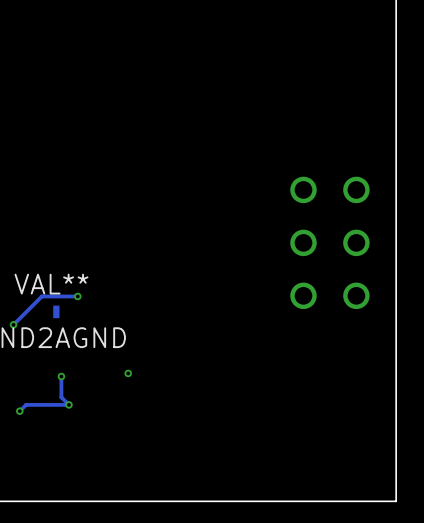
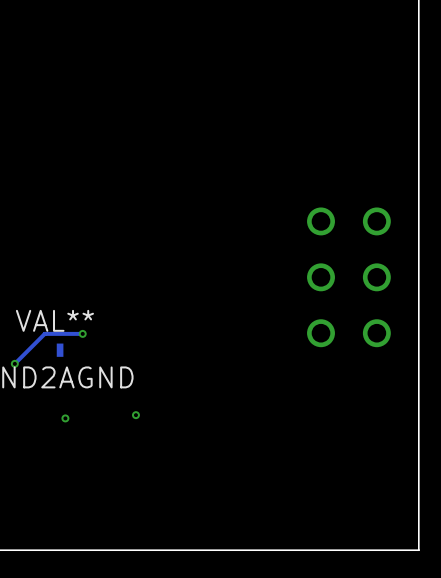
track: (61, 376) (61, 397) (68, 404) (26, 404) (19, 411) -> none
via: (68, 404) -> none
via: (19, 411) -> none

